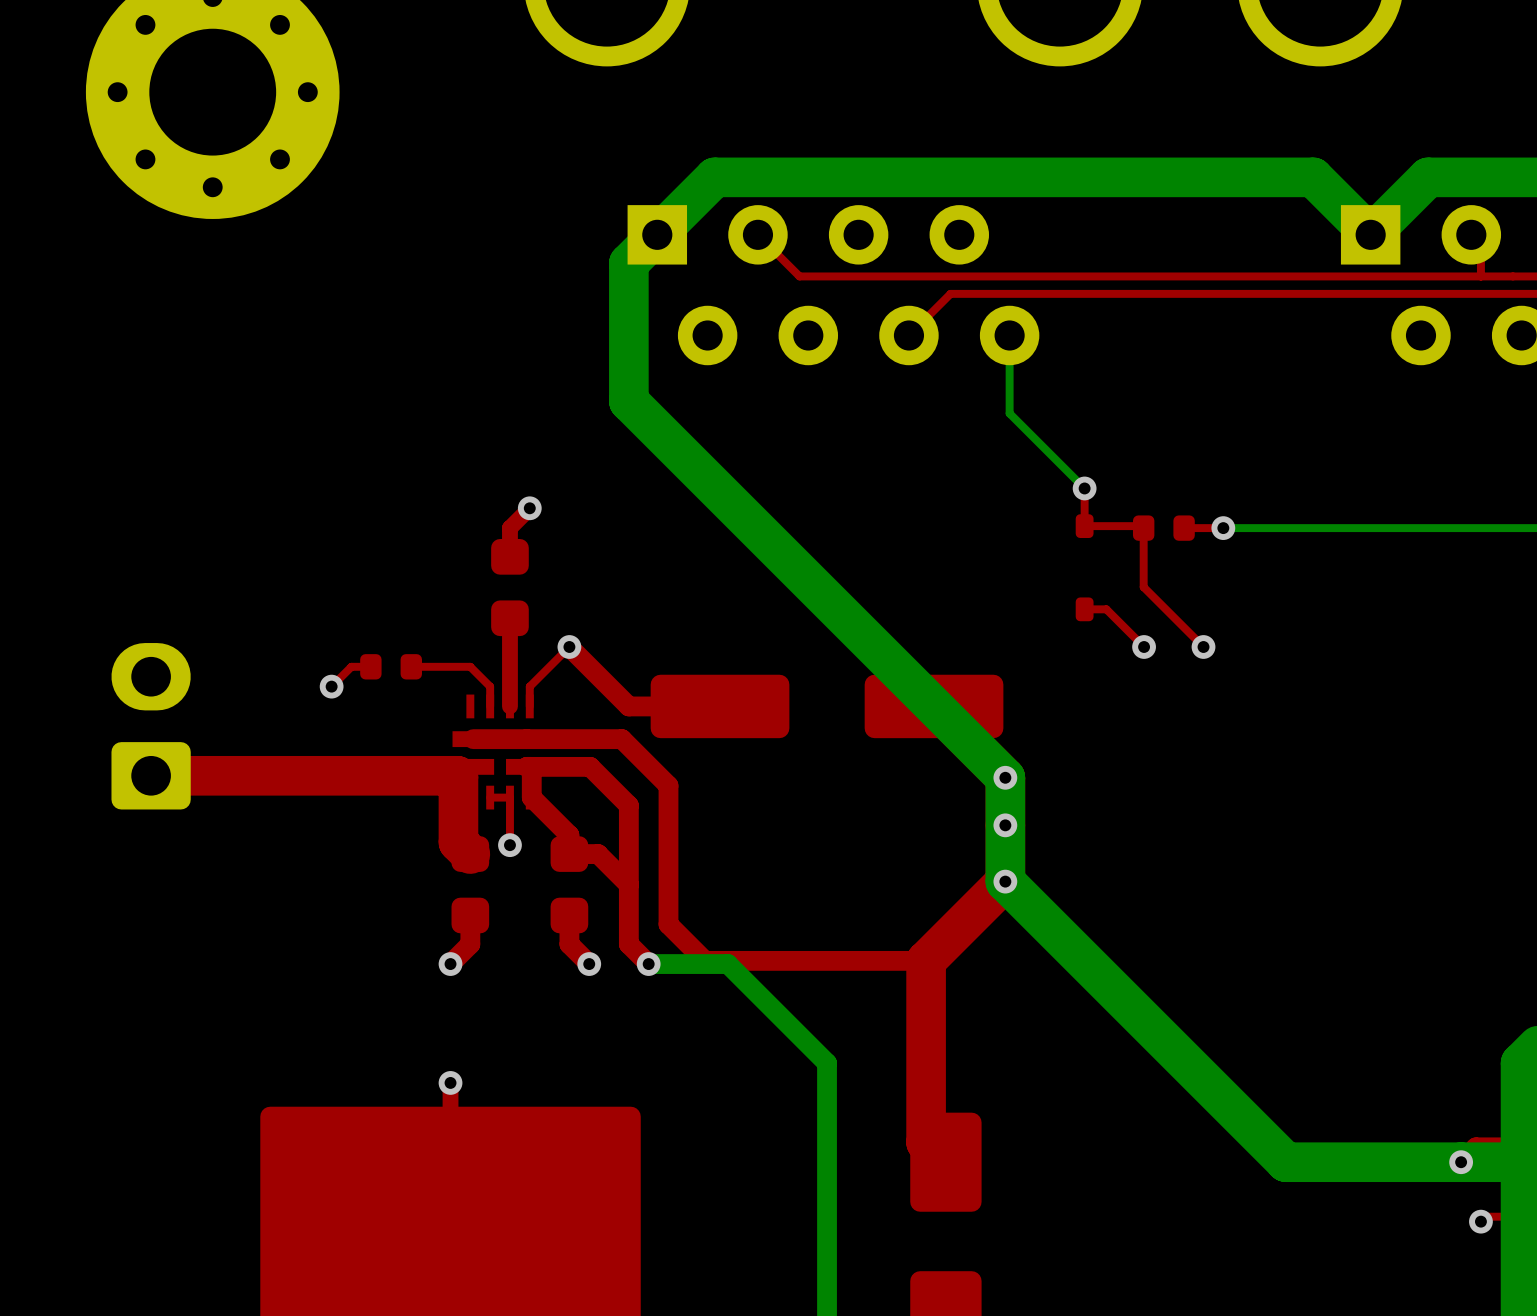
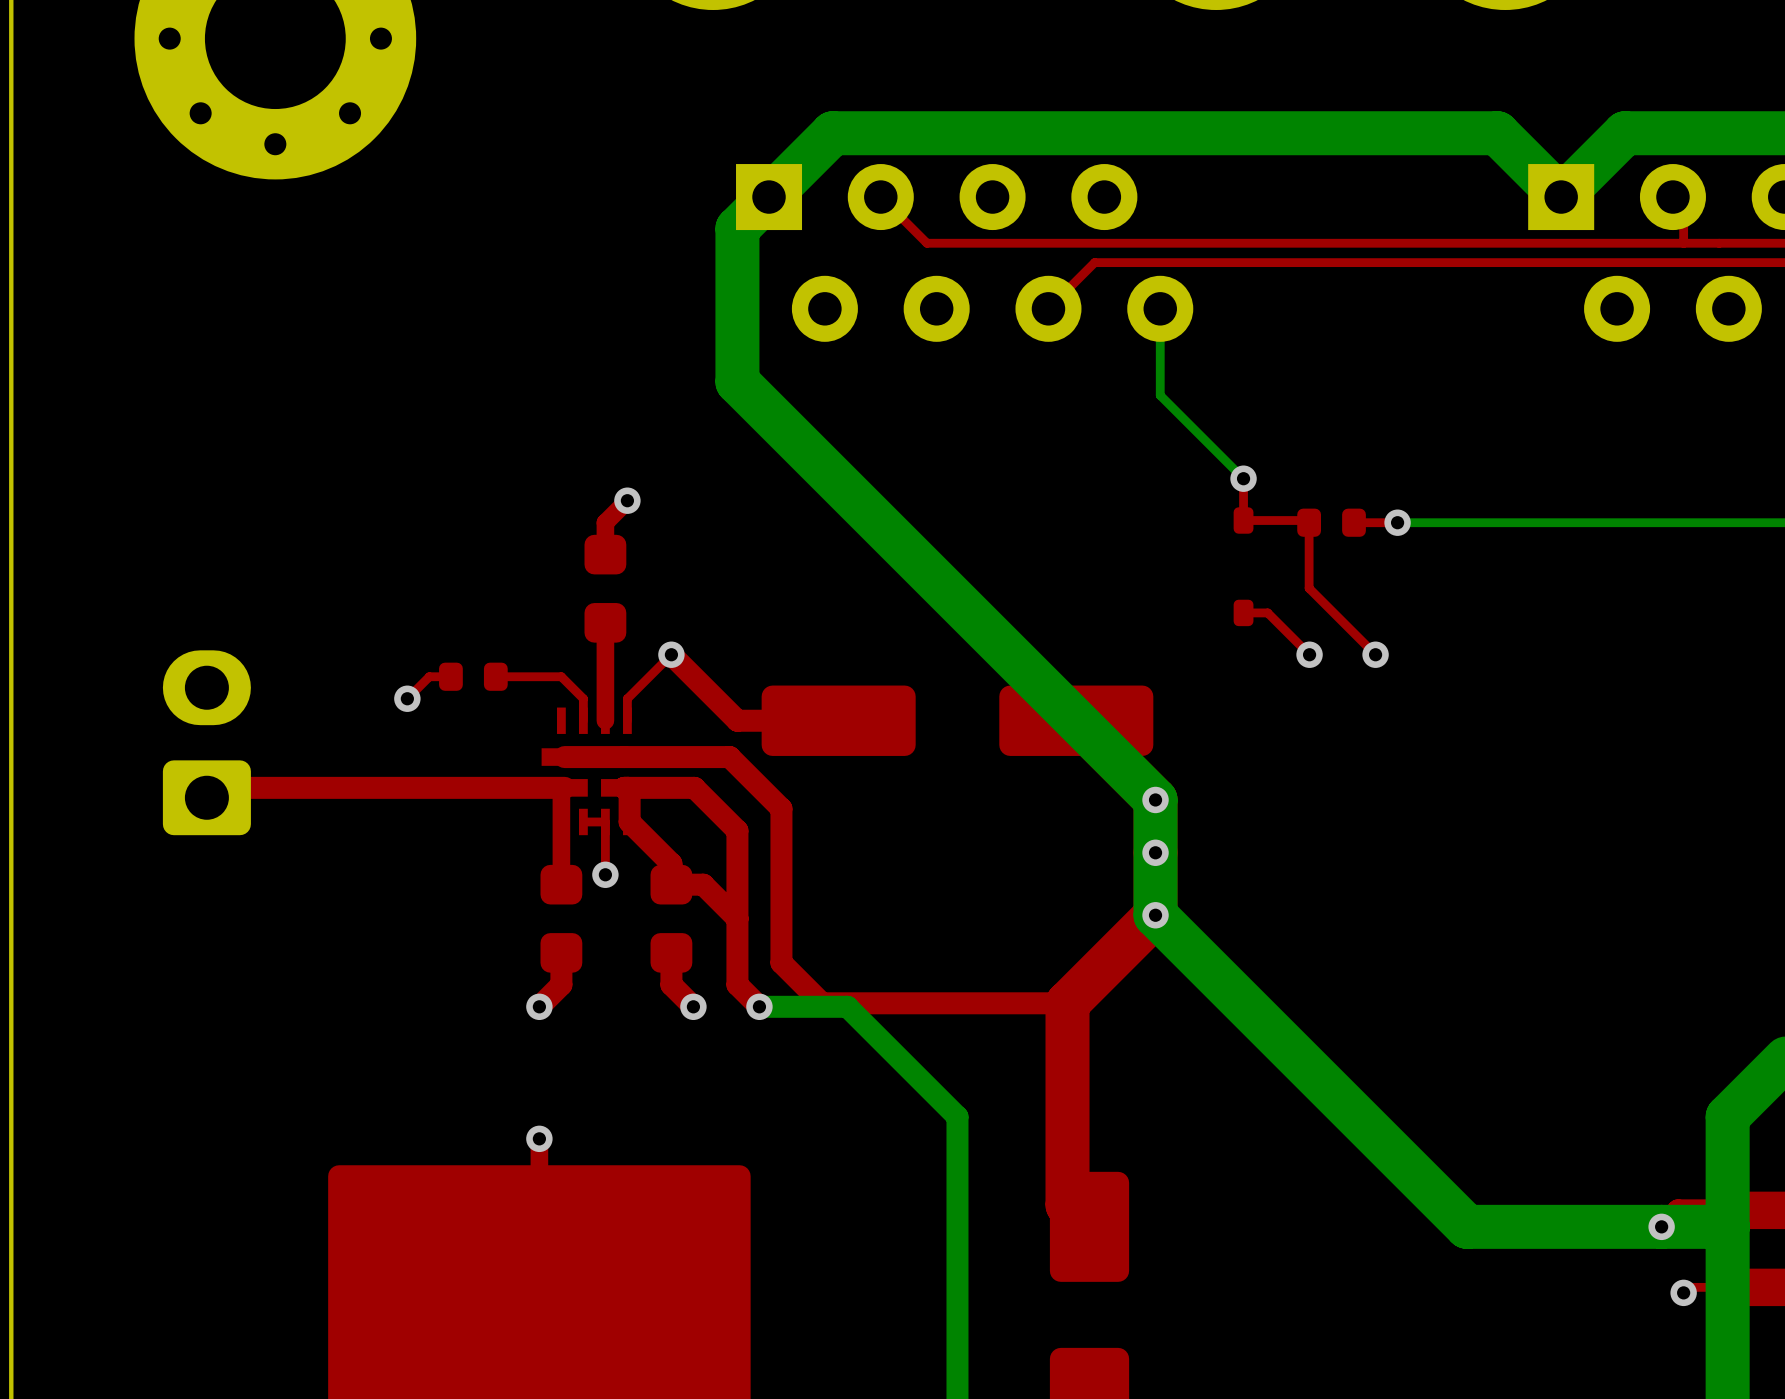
top track: (151, 775) (457, 775) (458, 842) (470, 854) -> (216, 787) (564, 787) (561, 791) (561, 884)

